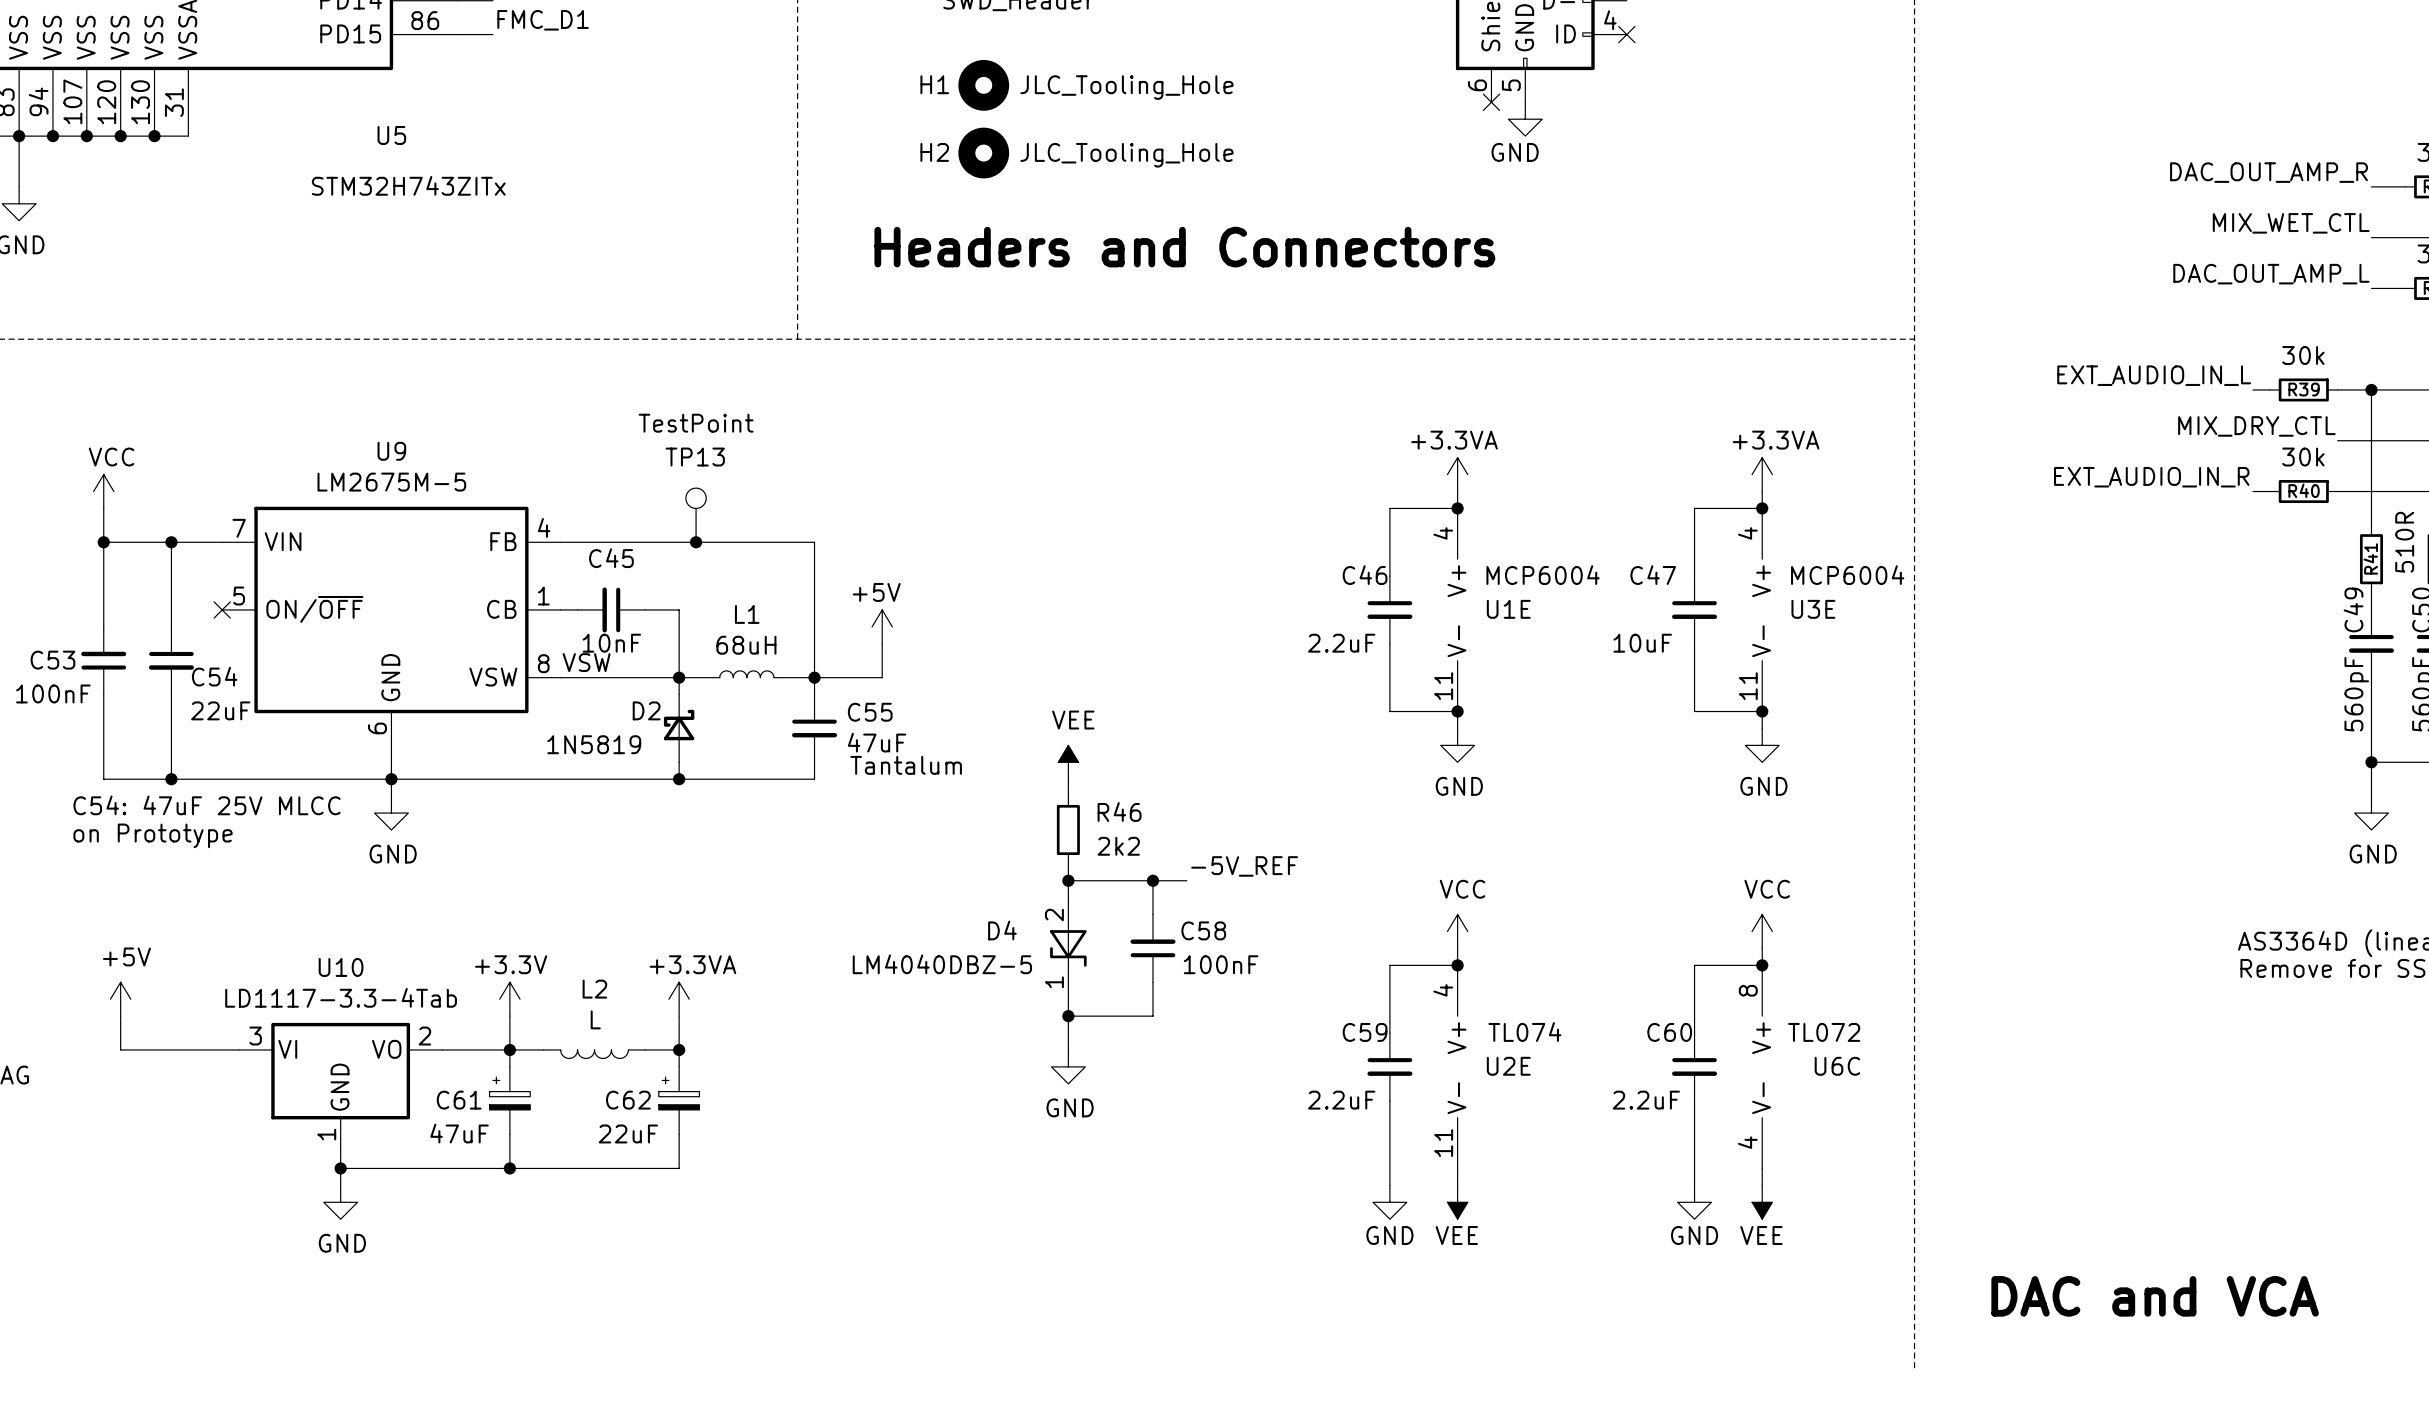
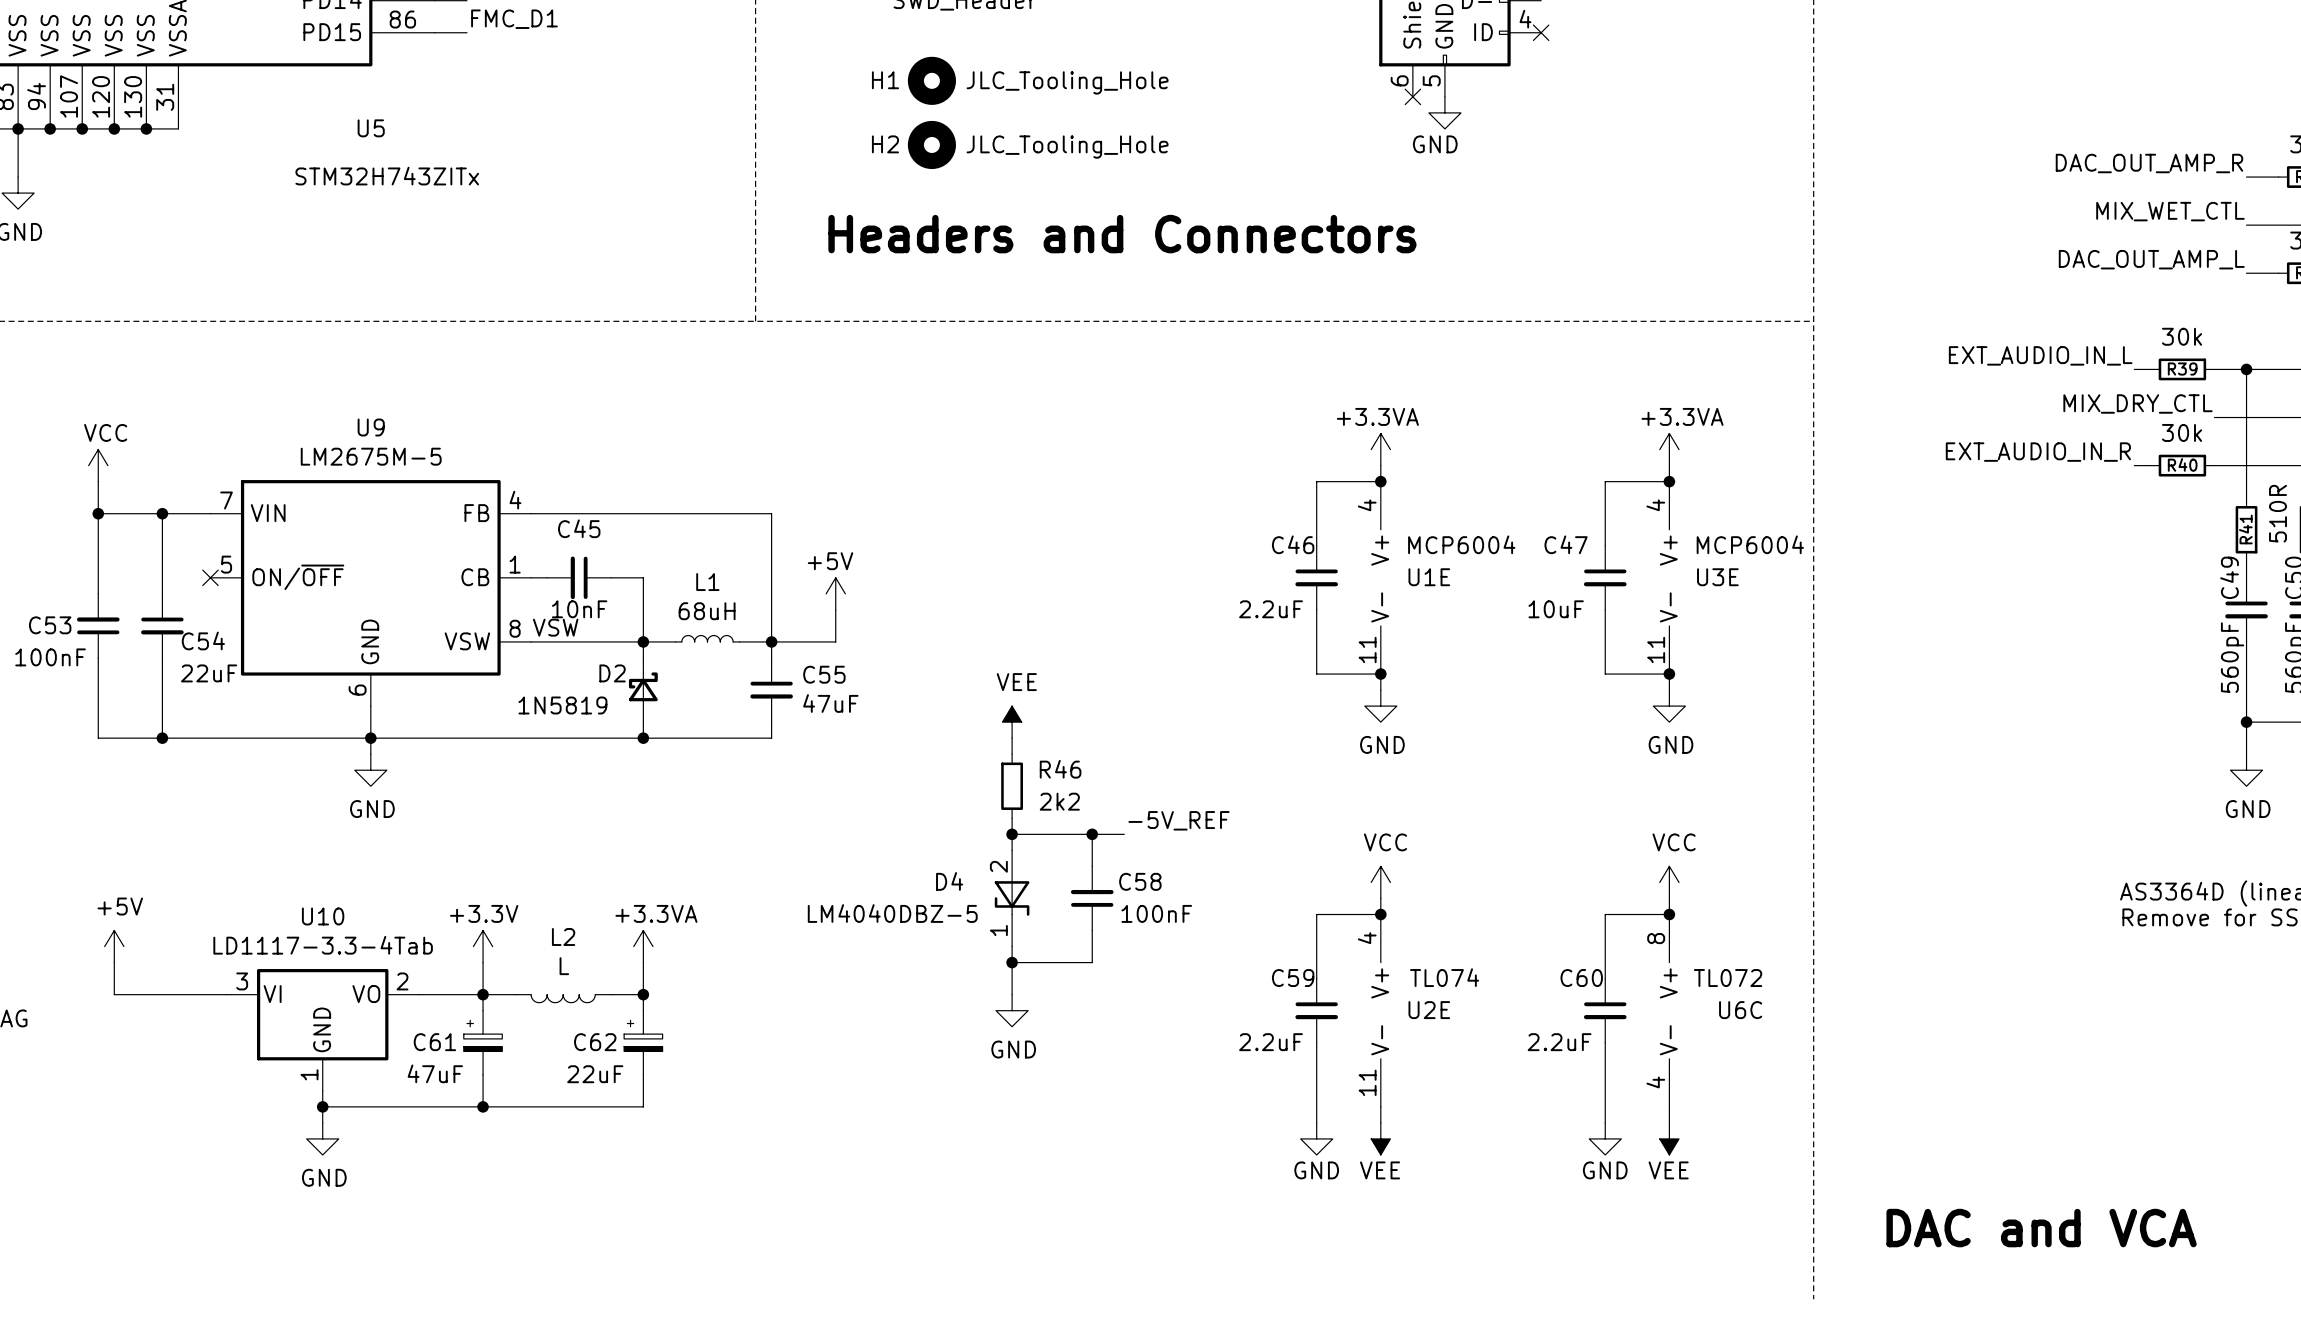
TP13: TestPoint (696, 515) -> none
junction: (696, 542) -> none
text: Tantalum (906, 765) -> none
text: C54: 47uF 25V MLCC (207, 805) -> none
text: on Prototype (153, 835) -> none

